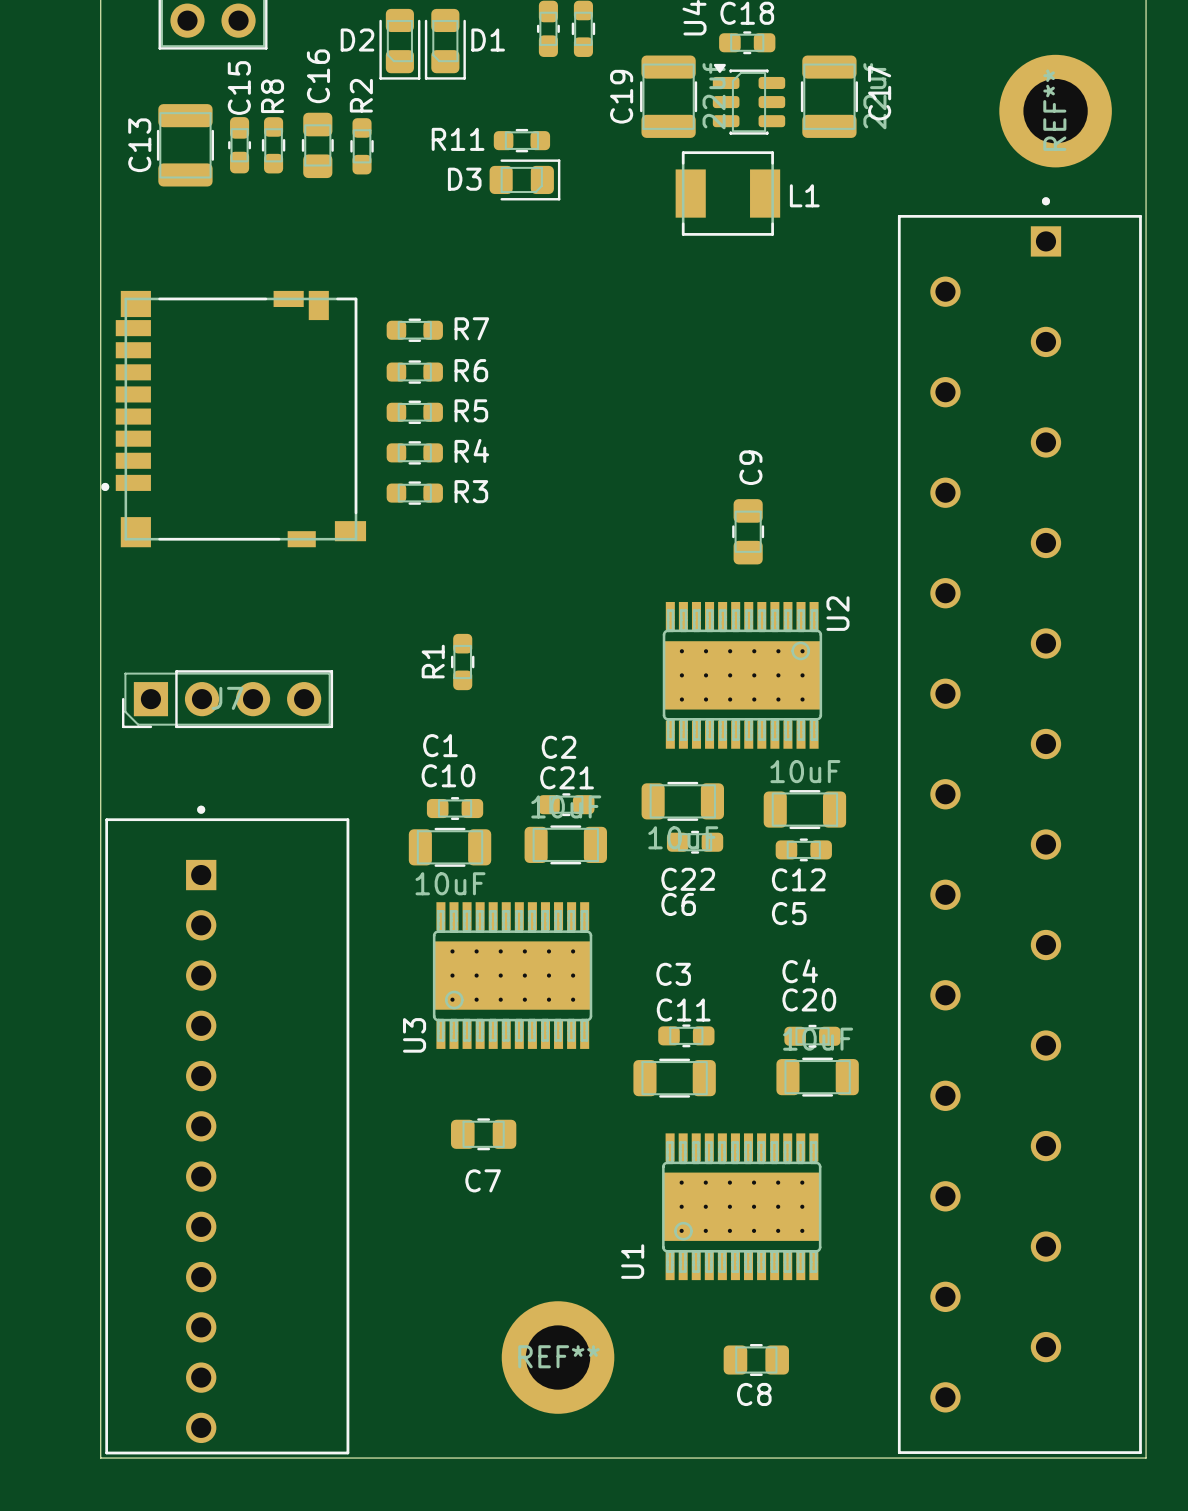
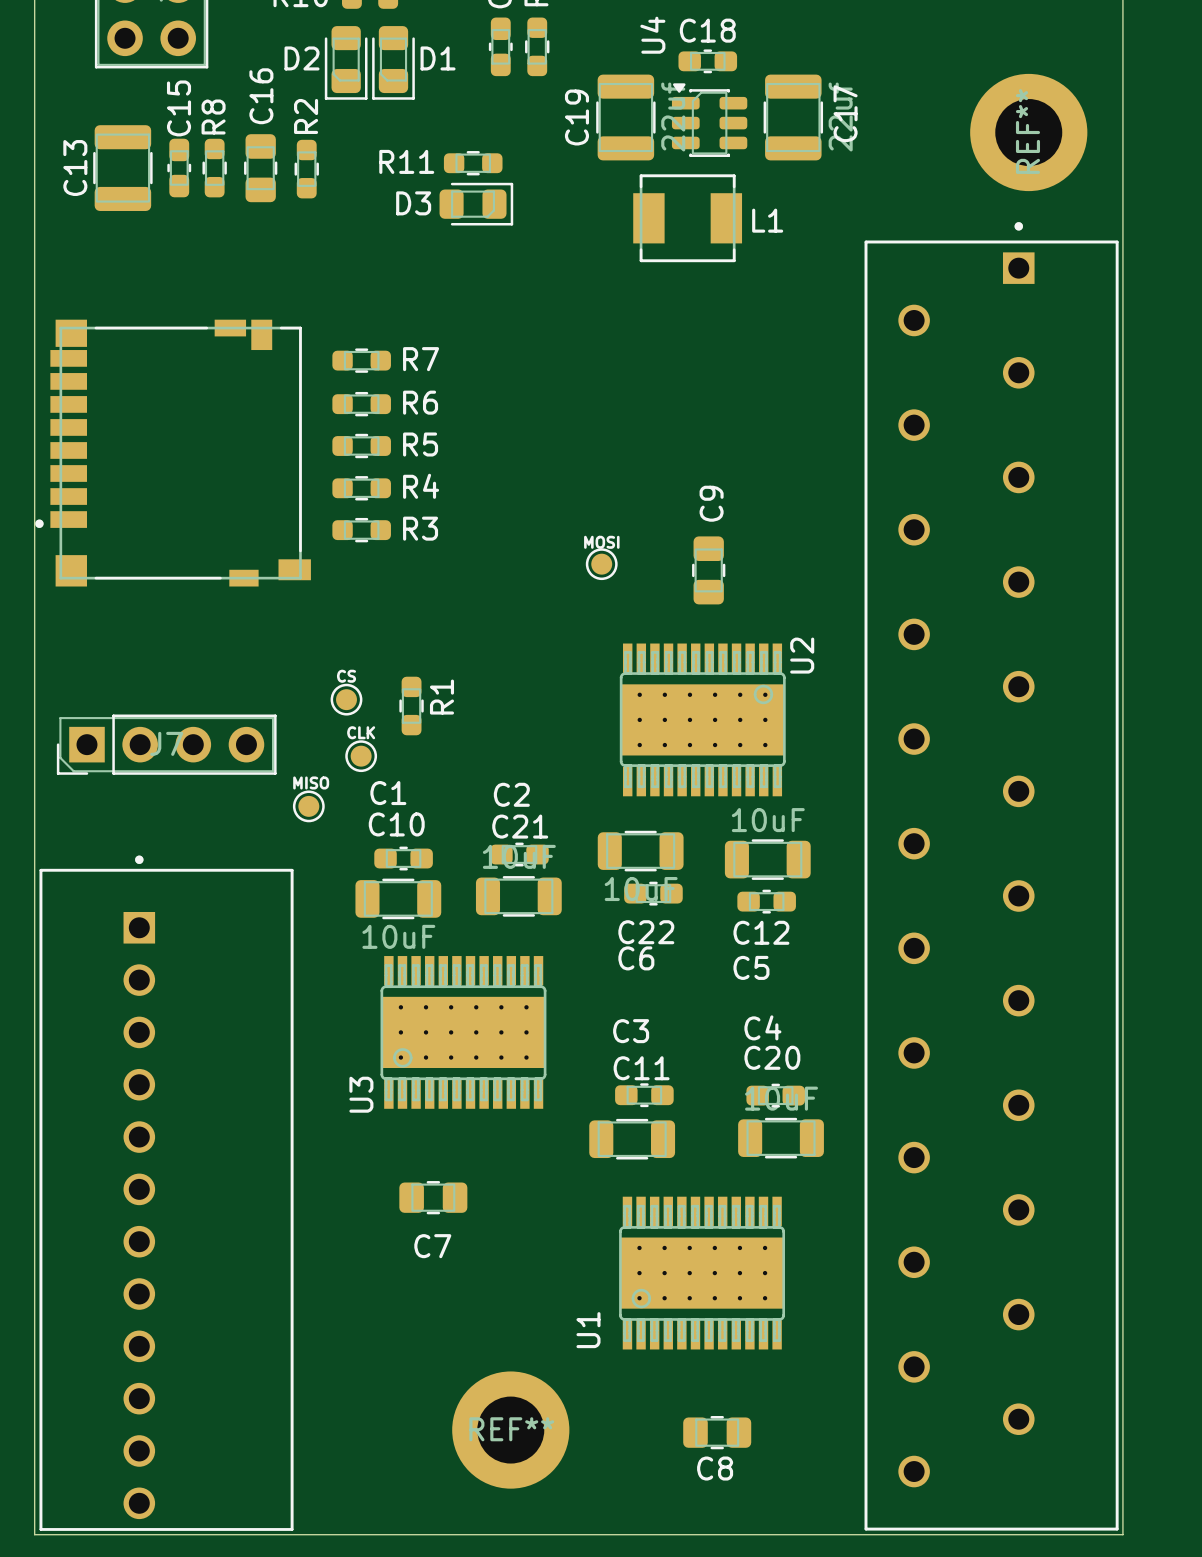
part: none -> MOSI (601, 564)
part: none -> CS (346, 699)
R1 name position: R1 (433, 661) -> R1 (441, 697)
part: none -> CLK (361, 756)
part: none -> MISO (308, 806)

